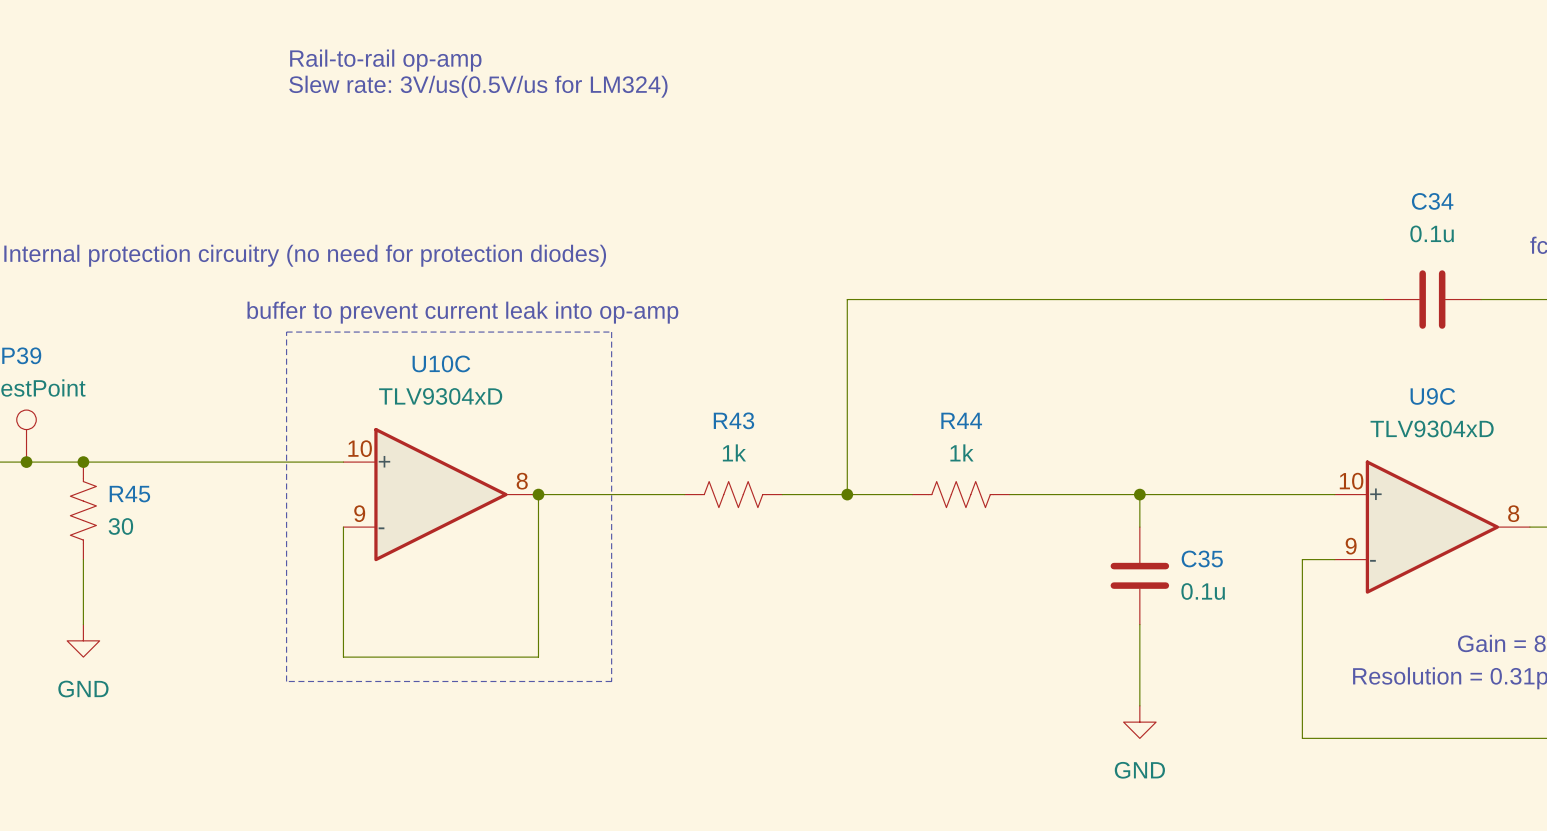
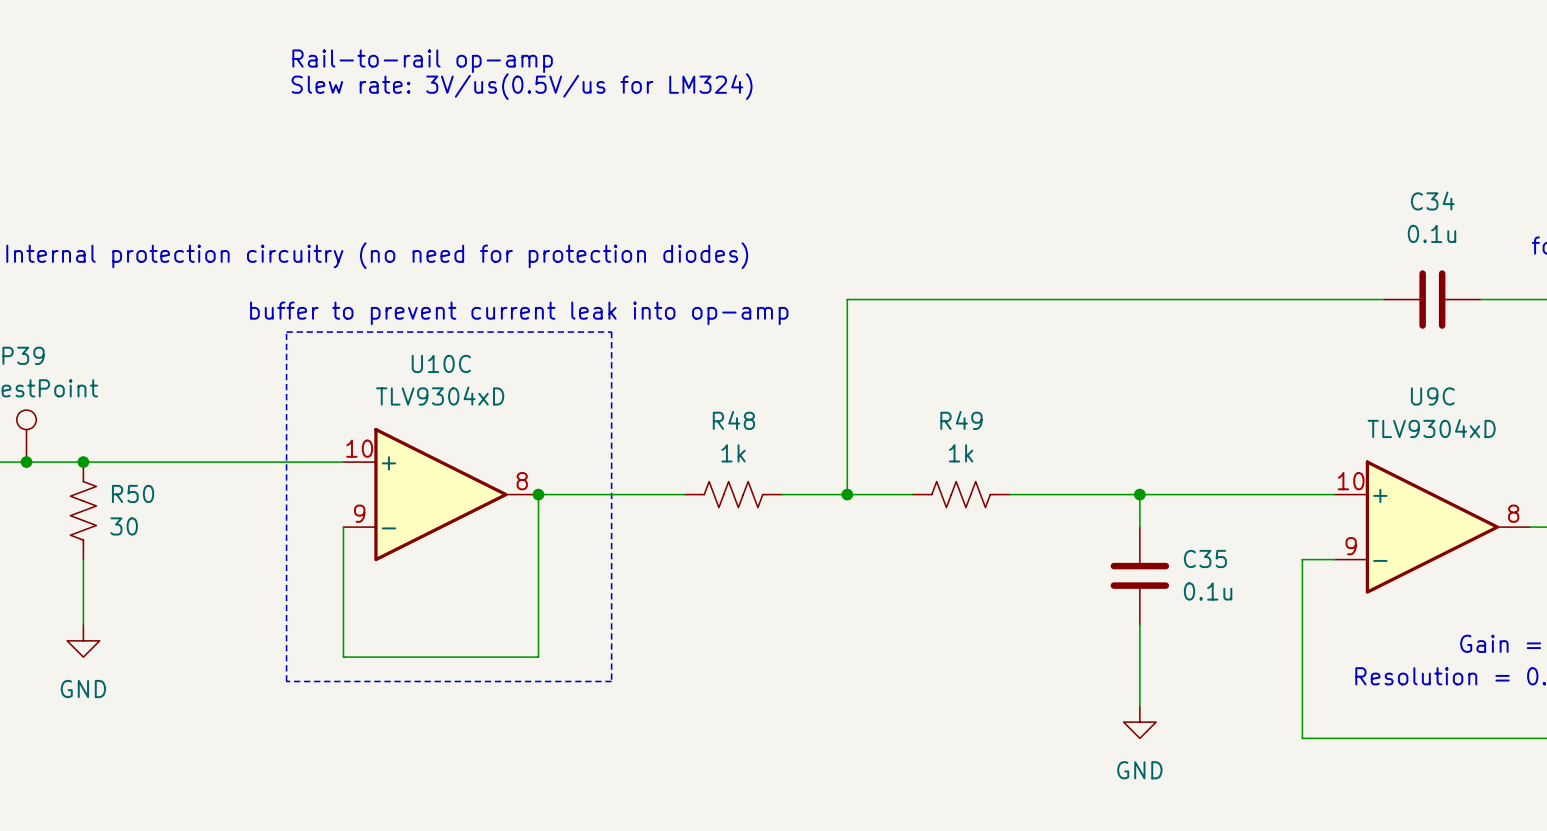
R43 name: R43 (733, 420) -> R48 (733, 420)
R44 name: R44 (961, 420) -> R49 (961, 420)
R45 name: R45 (129, 494) -> R50 (133, 493)

